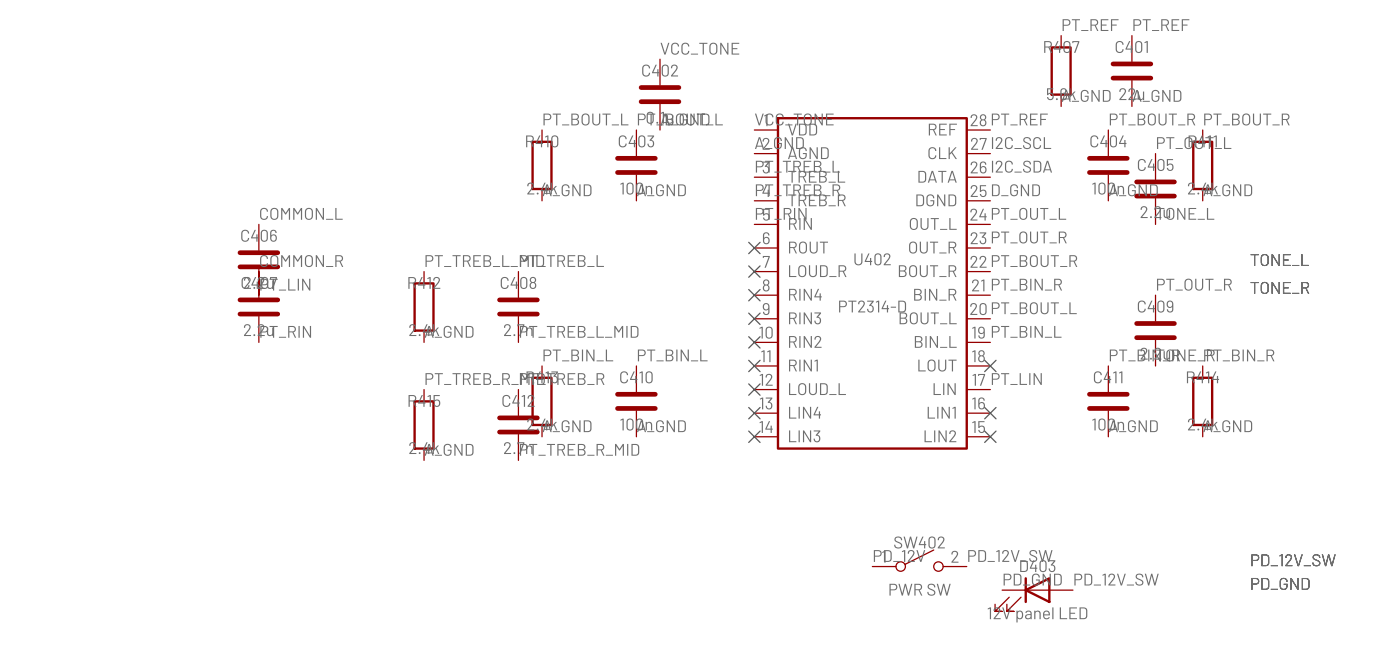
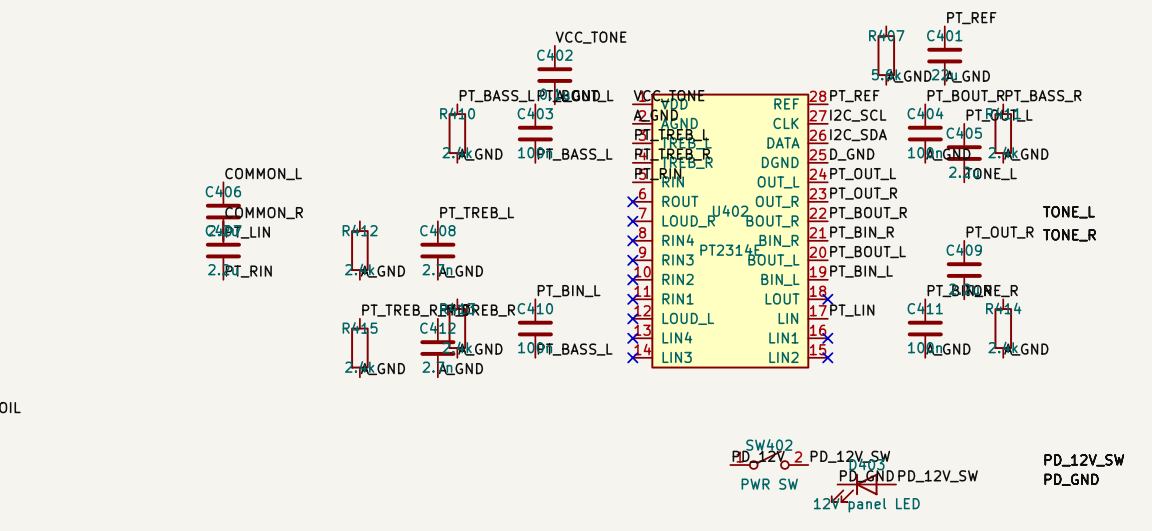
label: PT_REF (1090, 25) -> none
label: PT_BOUT_L (585, 119) -> PT_BASS_L (497, 96)
label: PT_BOUT_R (1246, 119) -> PT_BASS_R (1043, 96)
label: A_GND (661, 190) -> PT_BASS_L (575, 154)
label: PT_TREB_L_MID (484, 261) -> none
U402 value: PT2314-D (872, 306) -> PT2314E (730, 249)
label: PT_TREB_L_MID (579, 331) -> A_GND (460, 271)
label: PT_BIN_L (578, 355) -> none
label: PT_BIN_R (1239, 355) -> none
label: A_GND (661, 426) -> PT_BASS_L (575, 349)
label: PT_TREB_R_MID (579, 449) -> A_GND (460, 369)

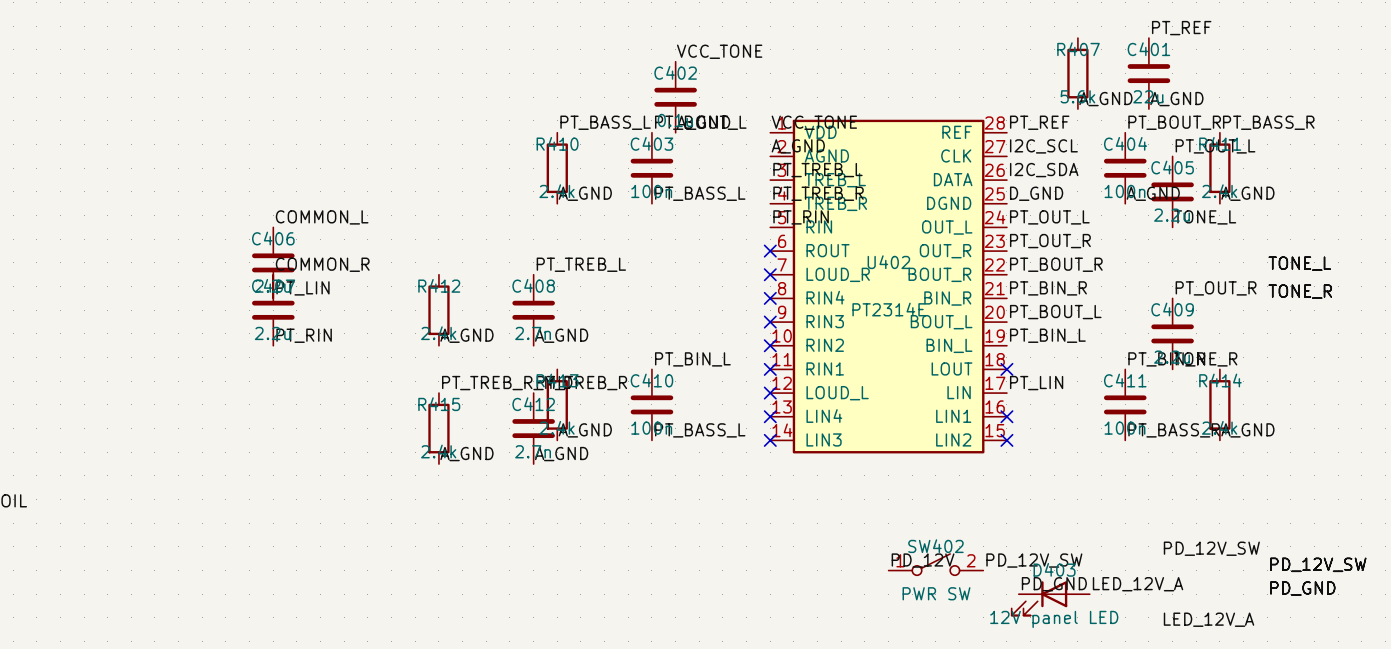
label: A_GND (948, 349) -> PT_BASS_R (1174, 430)
label: none -> PD_12V_SW (1211, 548)
label: PD_12V_SW (938, 476) -> LED_12V_A (1138, 584)
label: none -> LED_12V_A (1209, 619)

